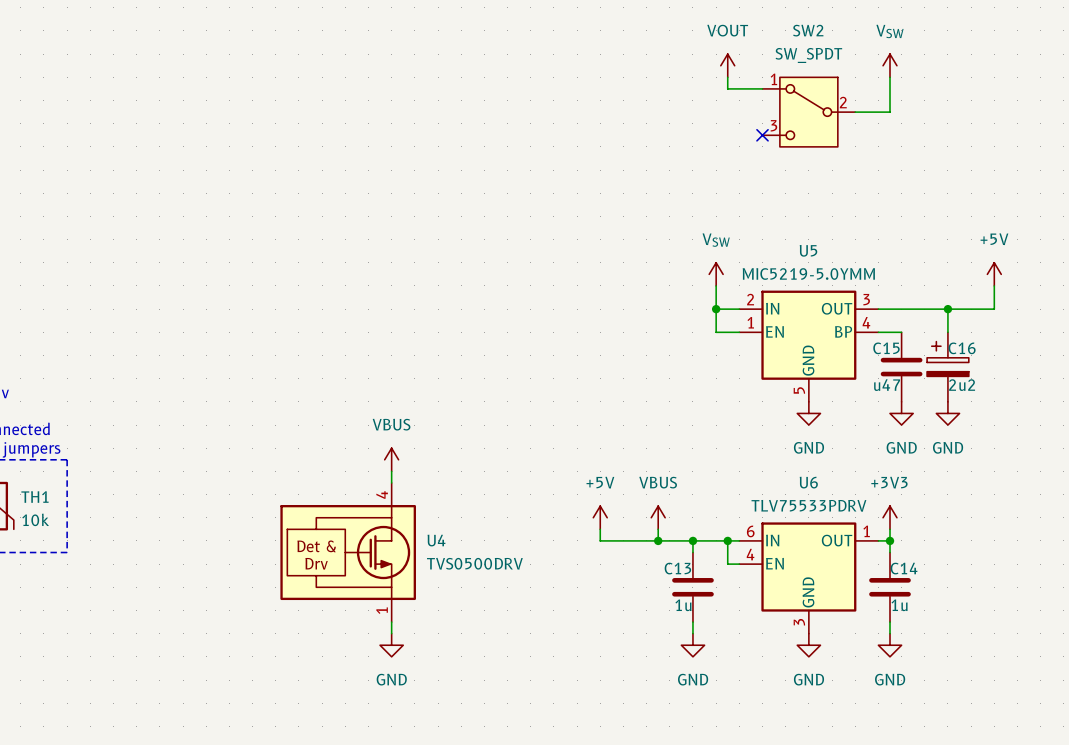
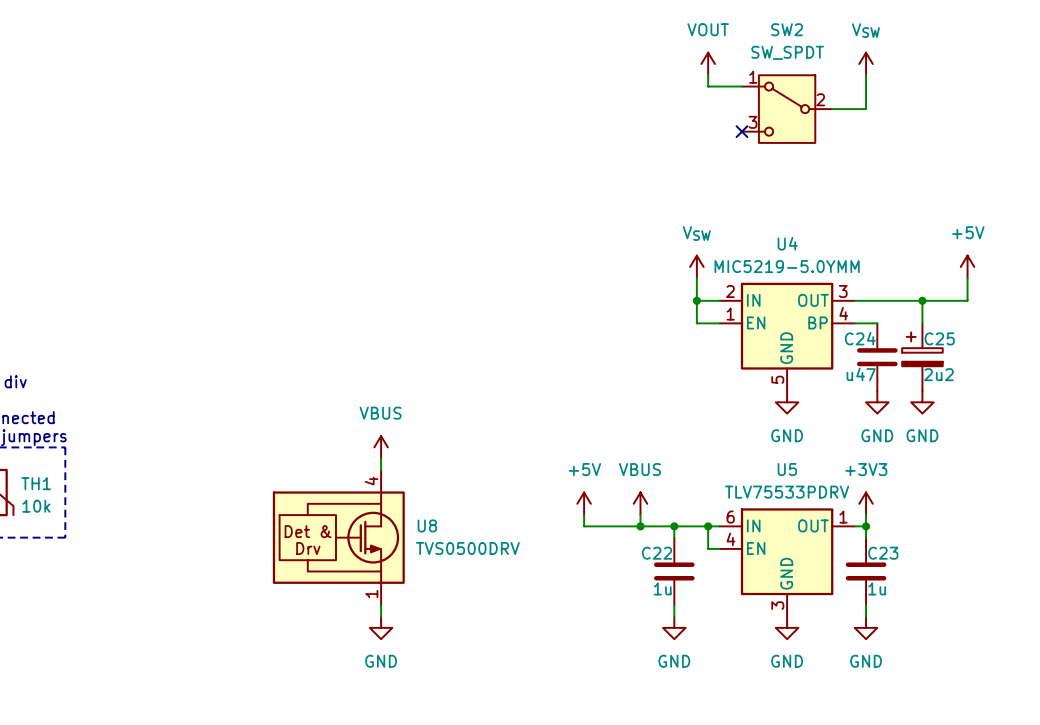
U5 name: U5 (808, 250) -> U4 (787, 243)
C15 name: C15 (886, 348) -> C24 (860, 338)
C16 name: C16 (962, 348) -> C25 (939, 338)
U6 name: U6 (808, 482) -> U5 (787, 469)
U4 name: U4 (436, 540) -> U8 (427, 525)
C13 name: C13 (677, 568) -> C22 (657, 553)
C14 name: C14 (904, 568) -> C23 (883, 553)

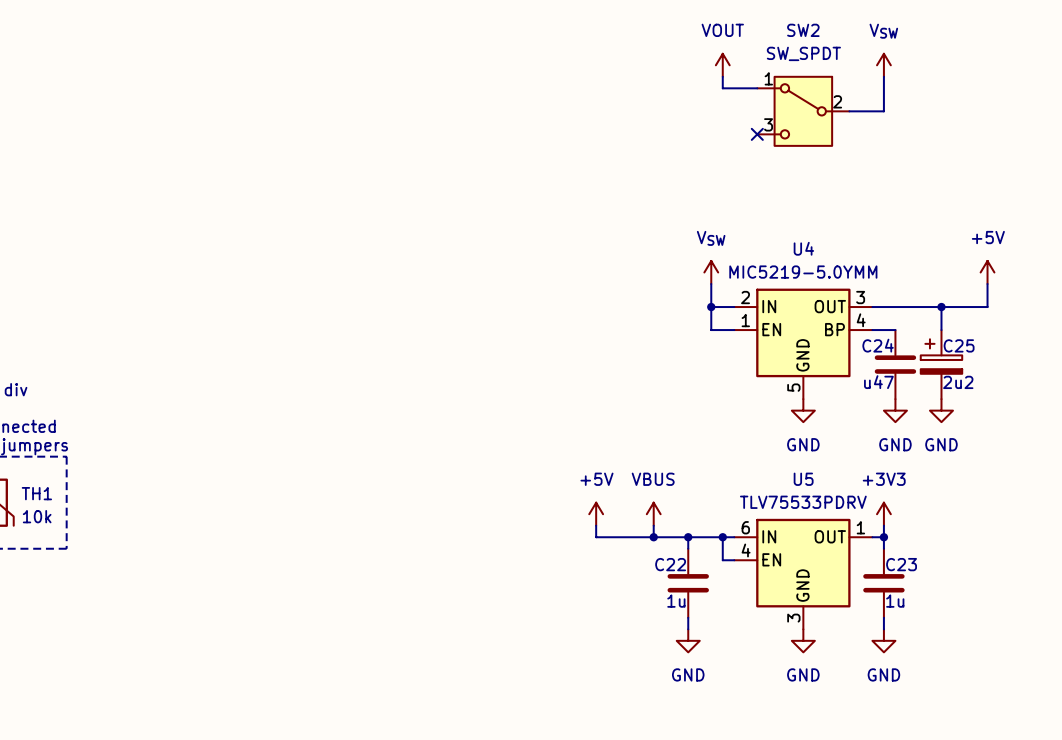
power symbol: VBUS (381, 447) -> none
wire: (381, 458) (381, 469) -> none
U8: TVS0500DRV (338, 537) -> none
wire: (381, 605) (381, 616) -> none
power symbol: GND (381, 627) -> none

